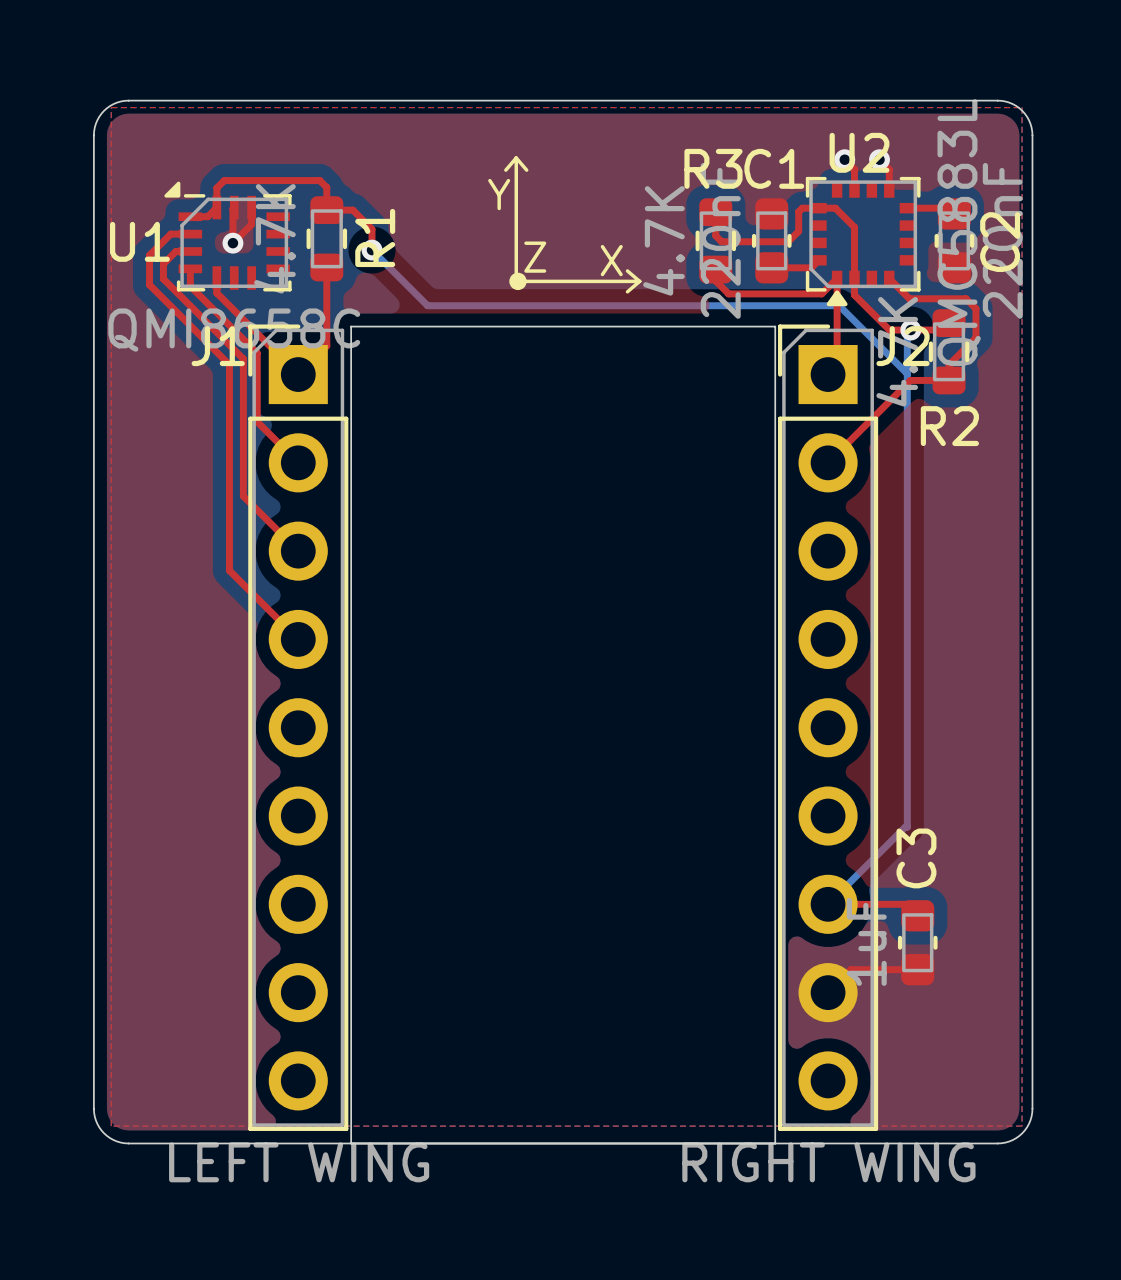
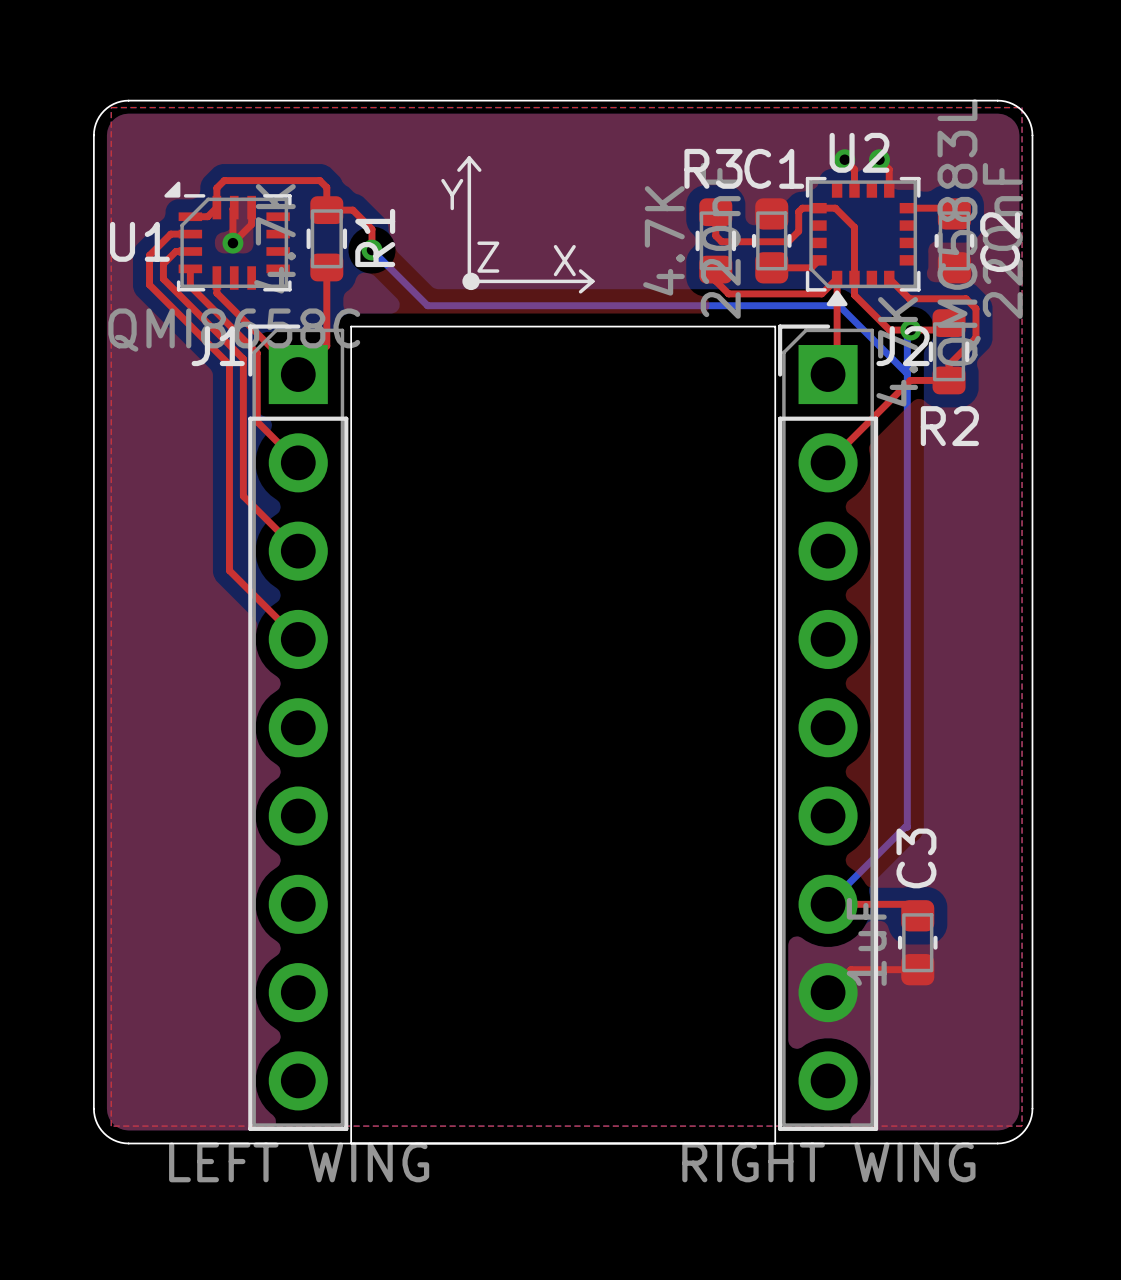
line: (516, 159) (516, 281) -> (469, 159) (469, 281)
line: (505, 170) (516, 157) (526, 170) -> (458, 170) (469, 157) (479, 170)
text position: Y (499, 194) -> Y (452, 194)
text position: Z (535, 257) -> Z (488, 257)
text position: X (611, 260) -> X (564, 260)
line: none -> (580, 270) (592, 281) (580, 291)
line: (627, 270) (639, 281) -> none
drawing position: (517, 281) -> (471, 281)
line: (592, 281) (639, 281) -> (471, 281) (517, 281)
line: (639, 281) (627, 291) -> none

